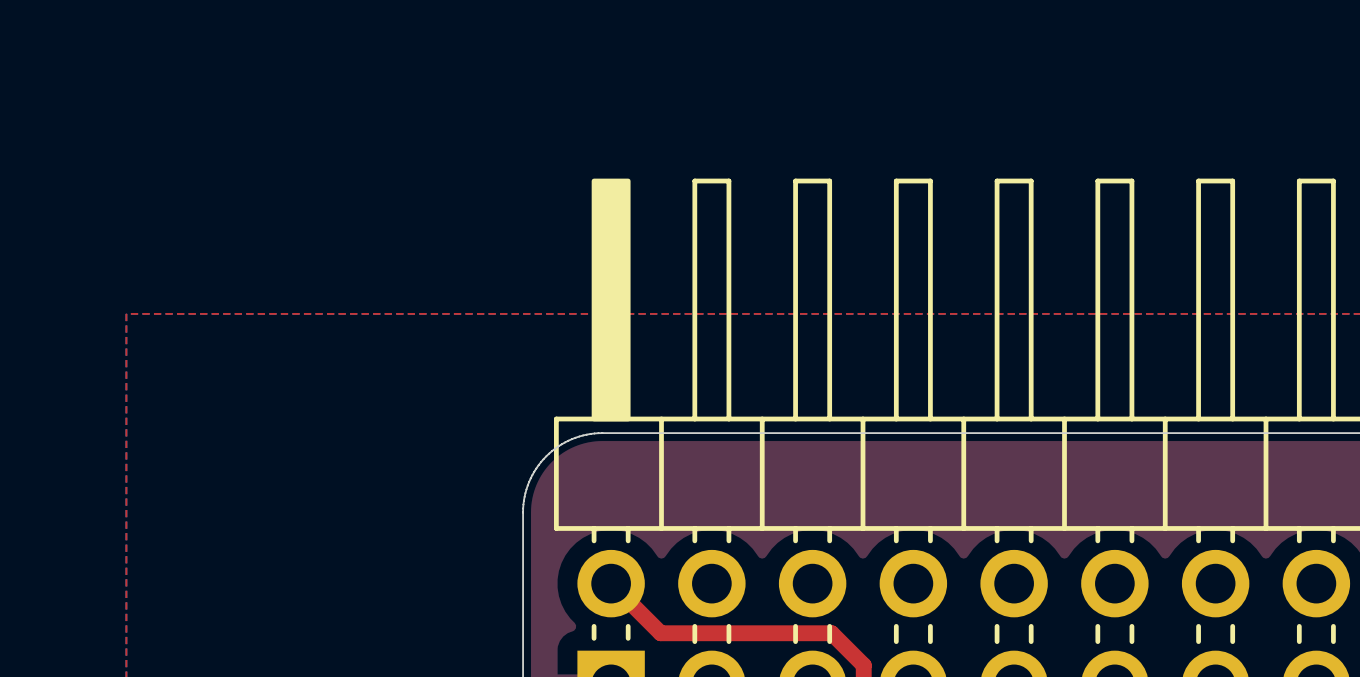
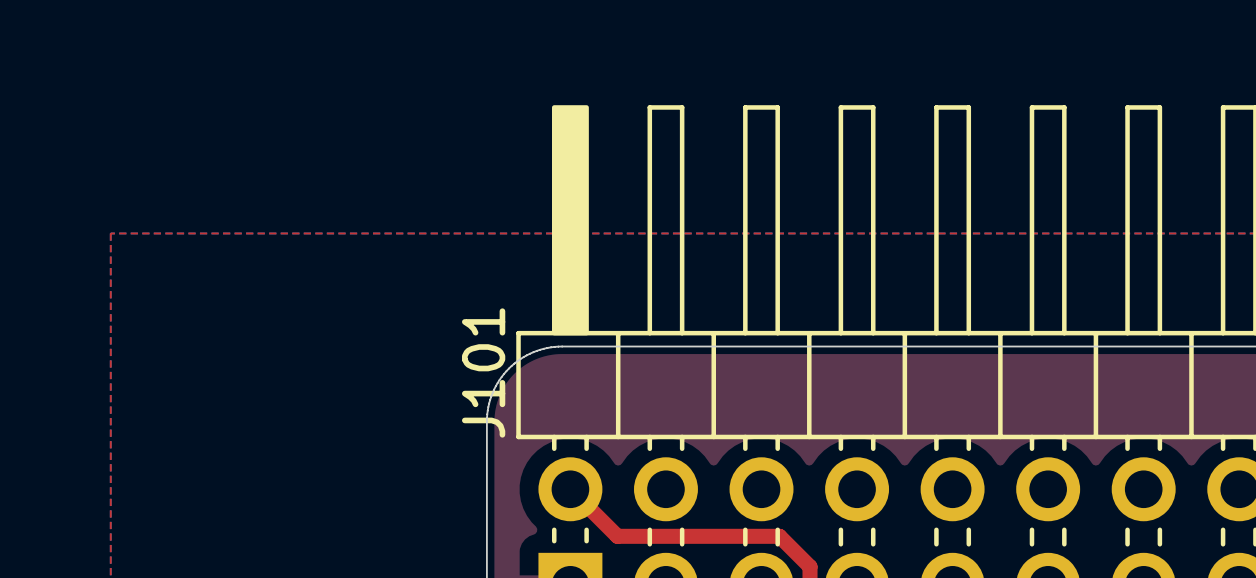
J101 name: none -> J101 (483, 372)

